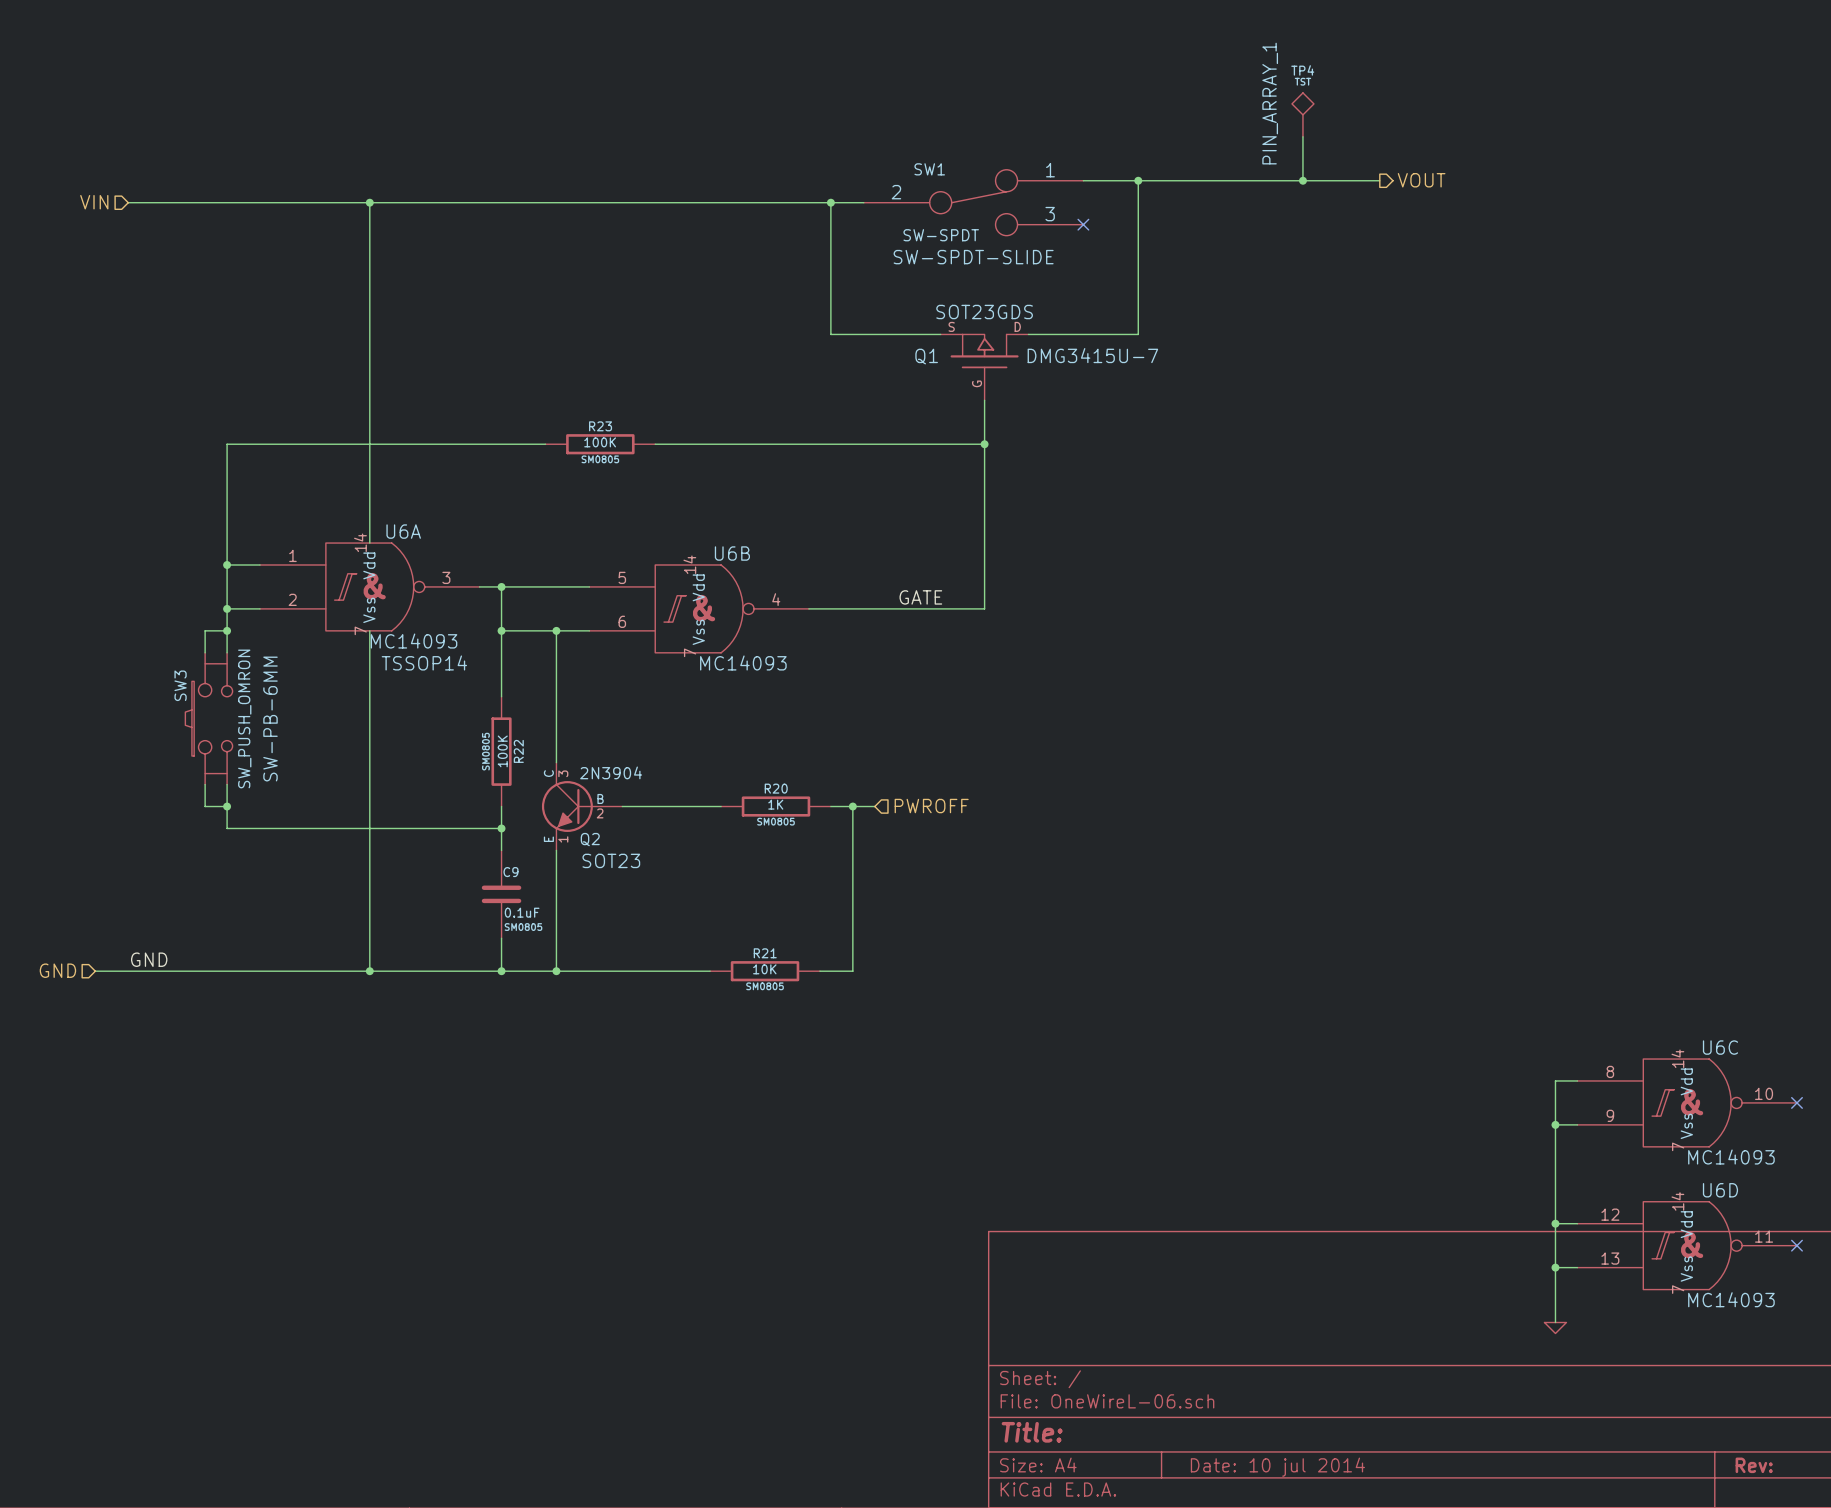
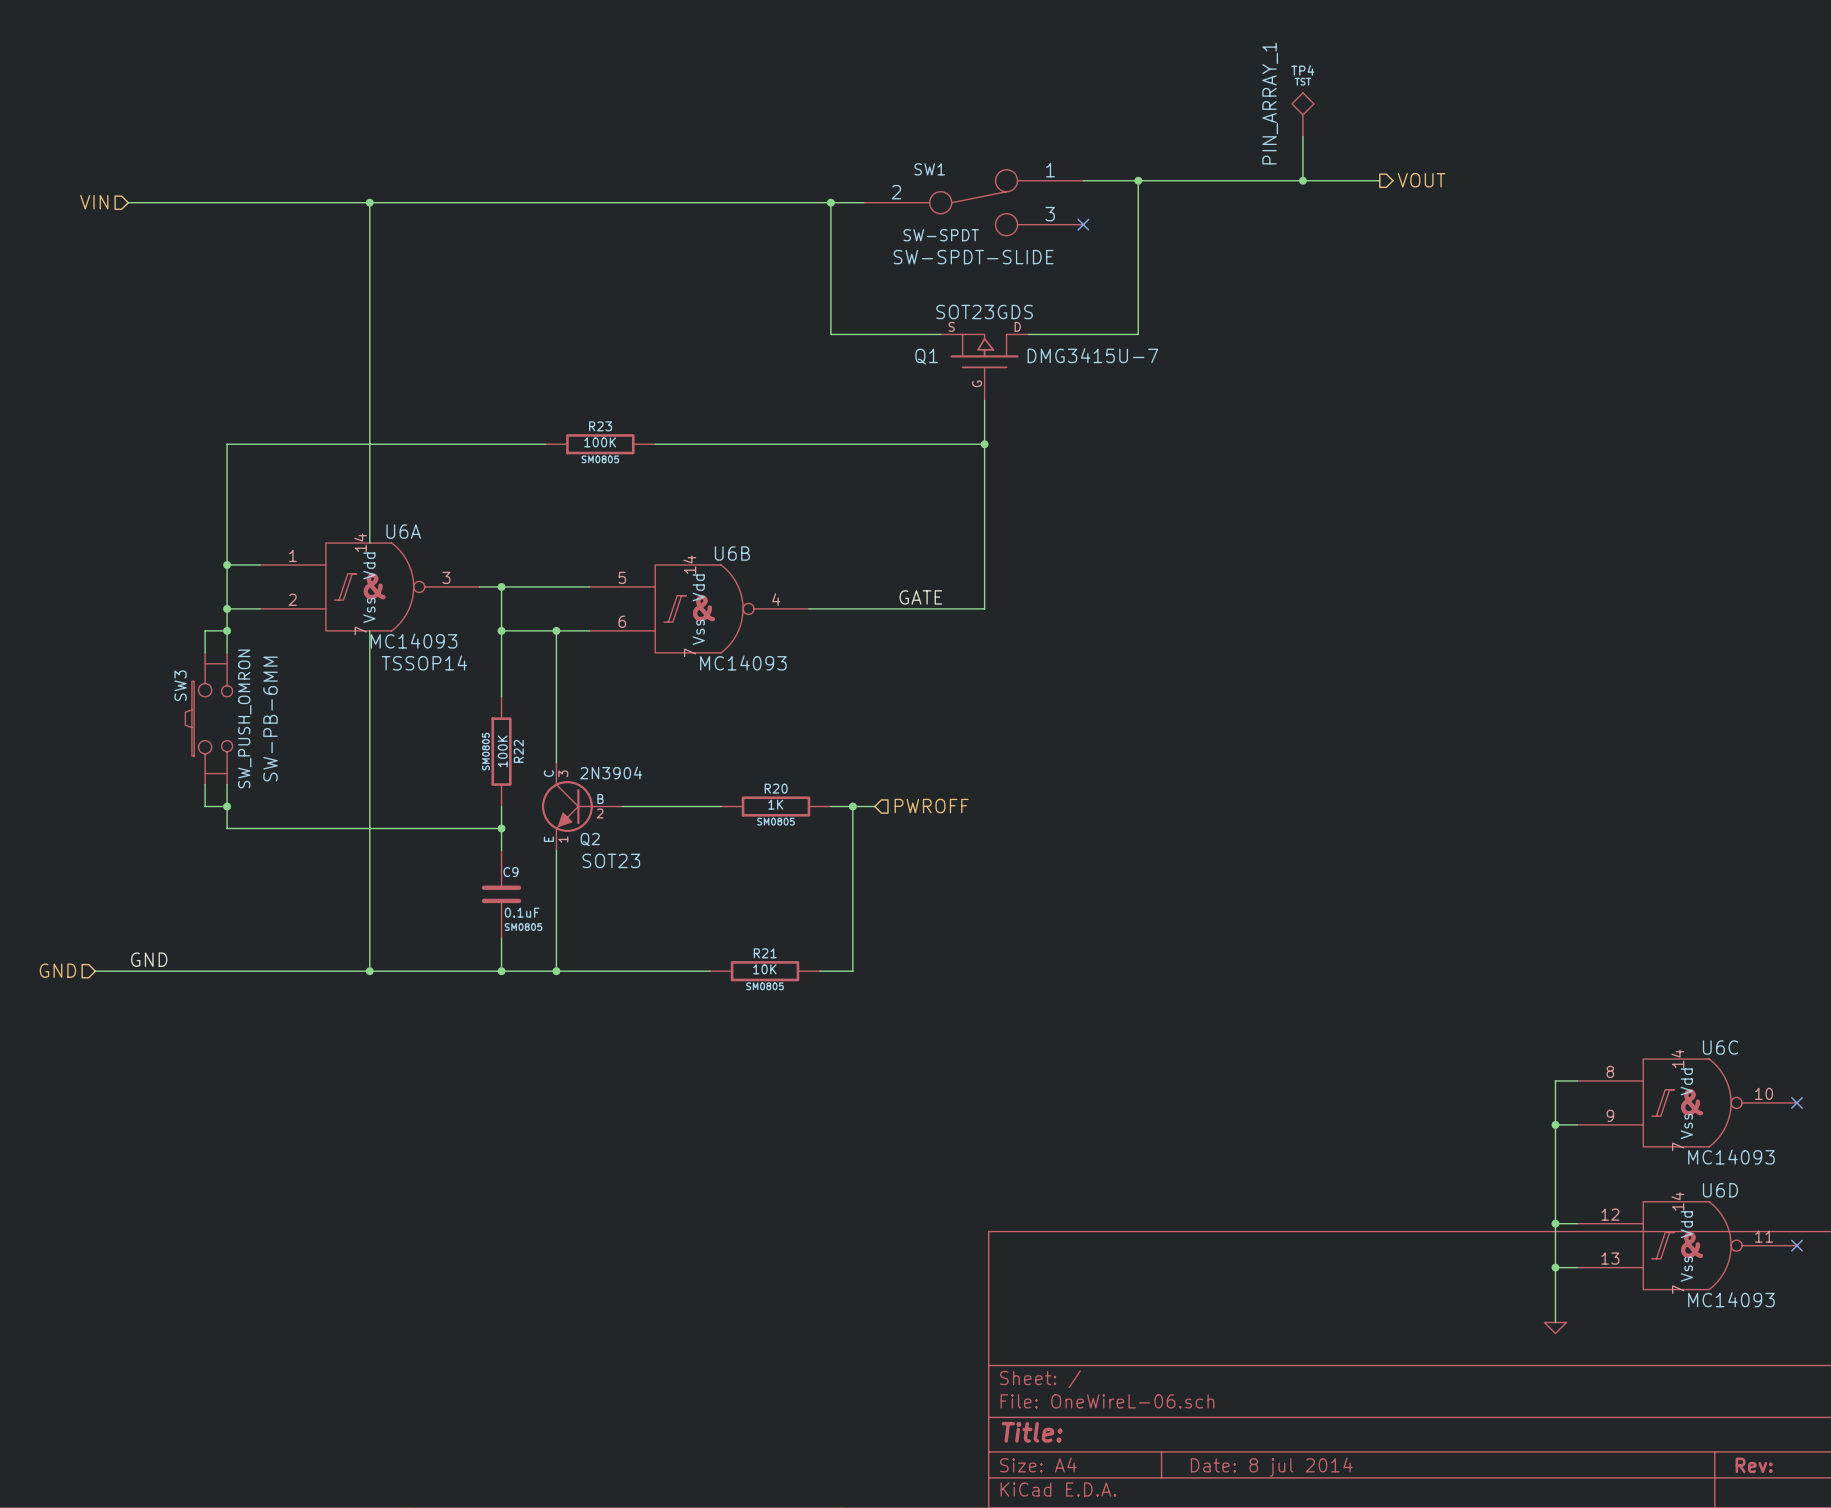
title block: Date: 10 jul 2014 (1277, 1467) -> Date: 8 jul 2014 (1271, 1467)

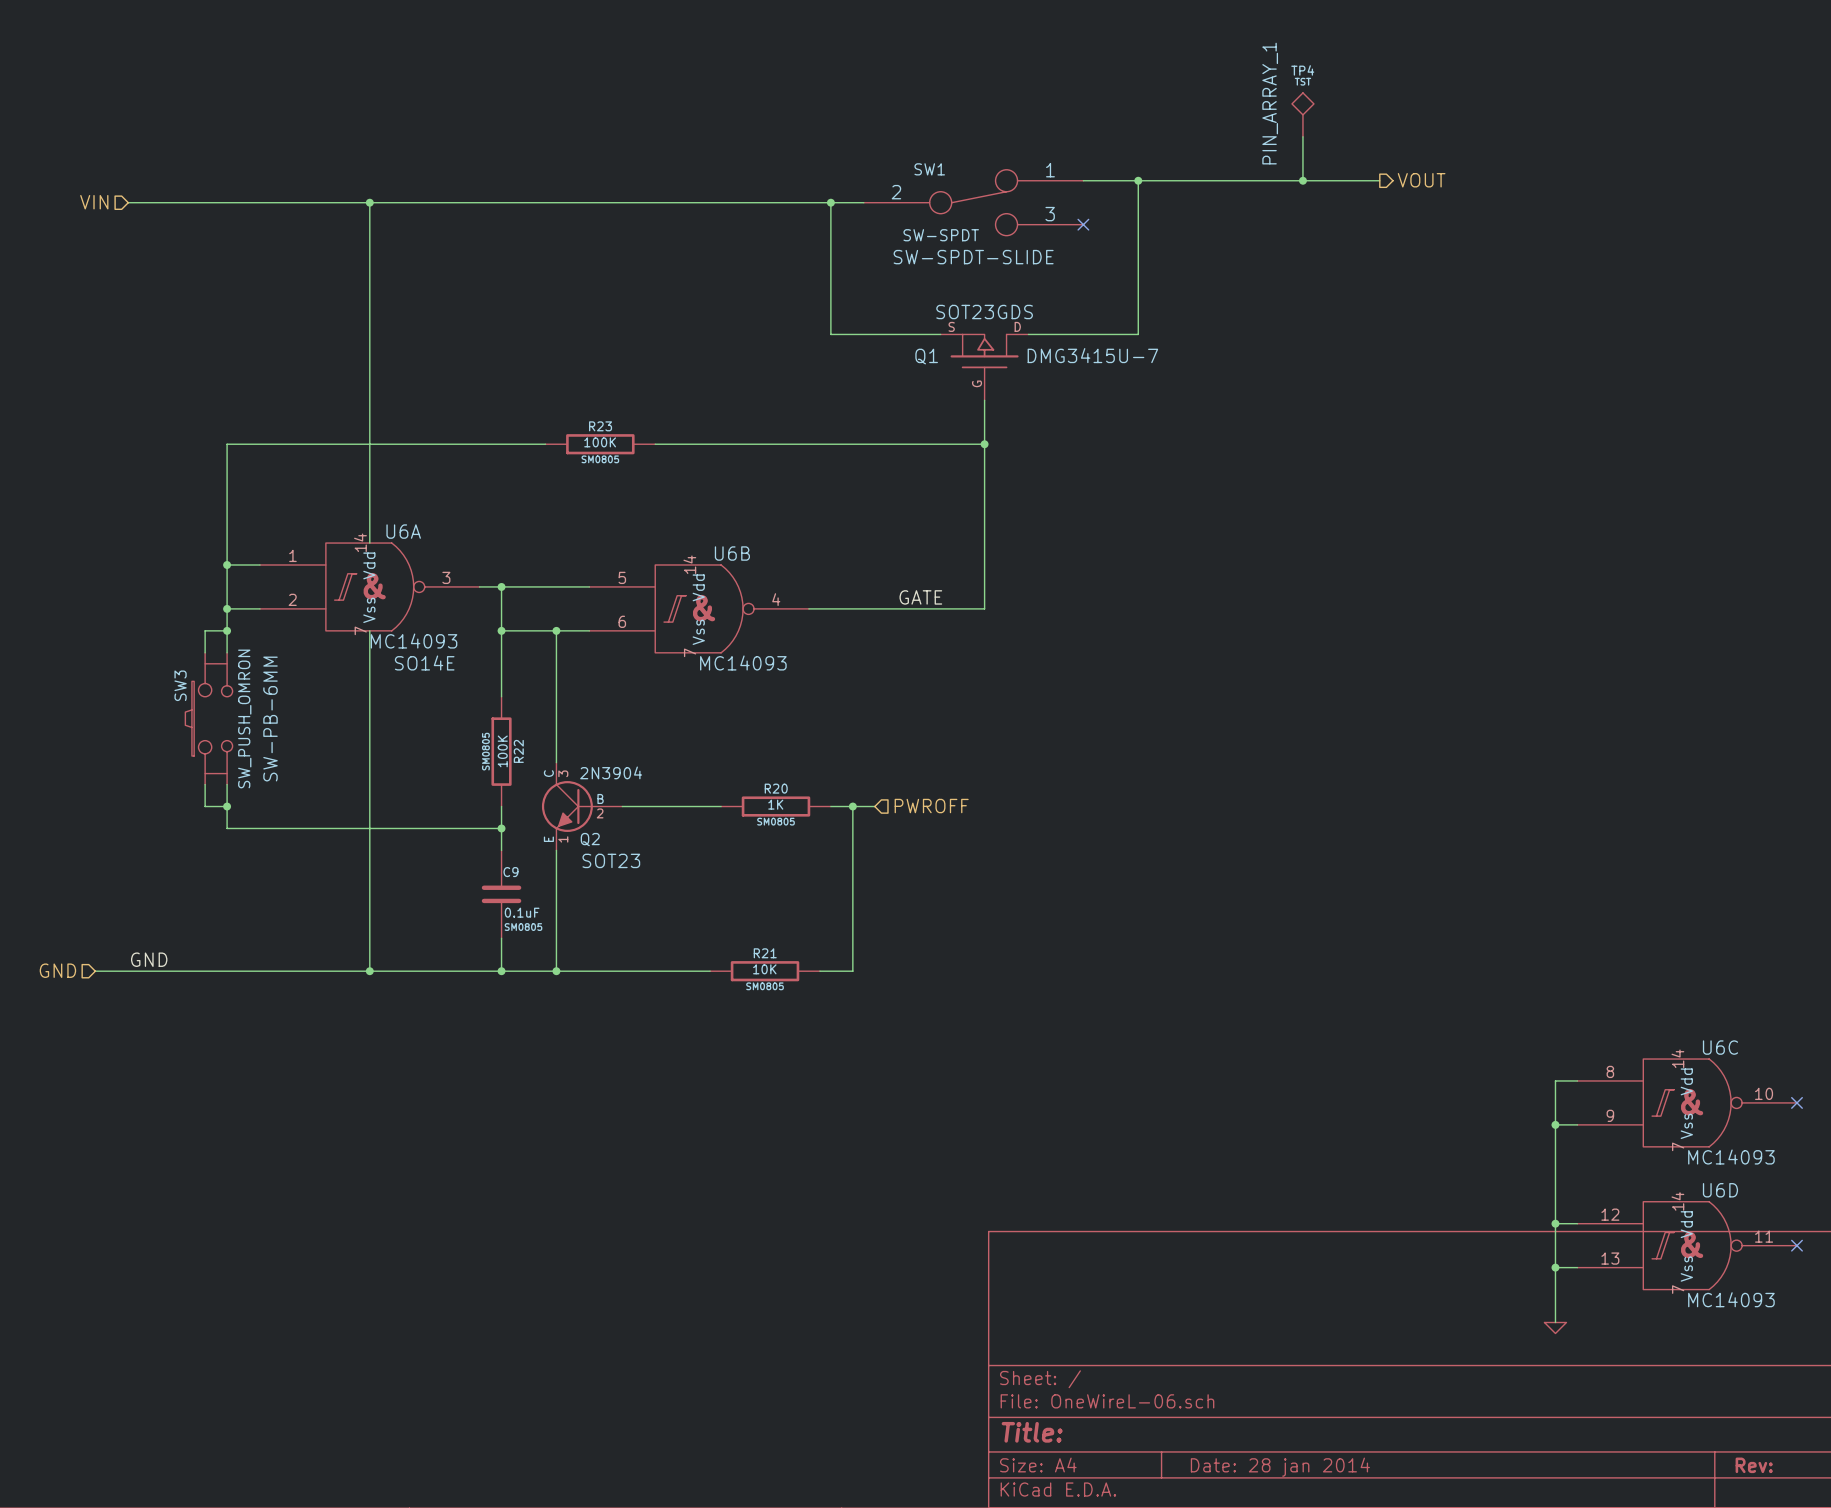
U6A text: TSSOP14 (424, 662) -> SO14E (424, 662)
title block: Date: 8 jul 2014 (1271, 1467) -> Date: 28 jan 2014 (1280, 1467)

